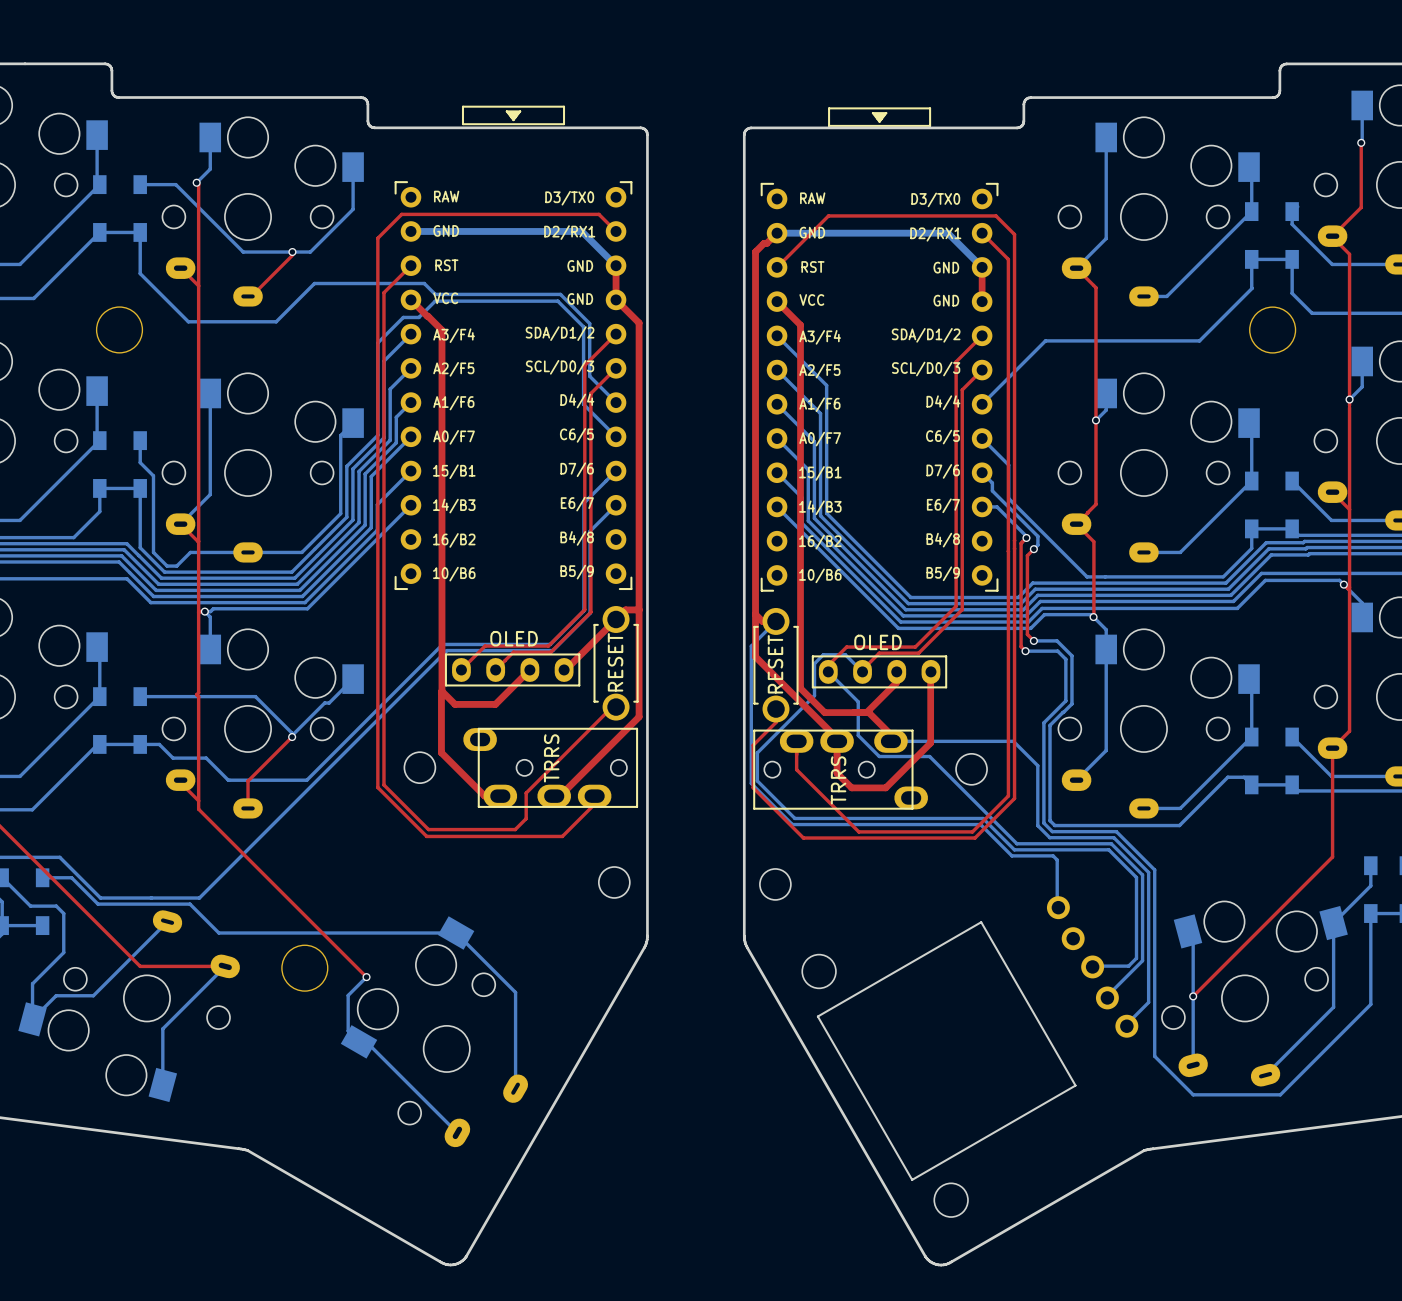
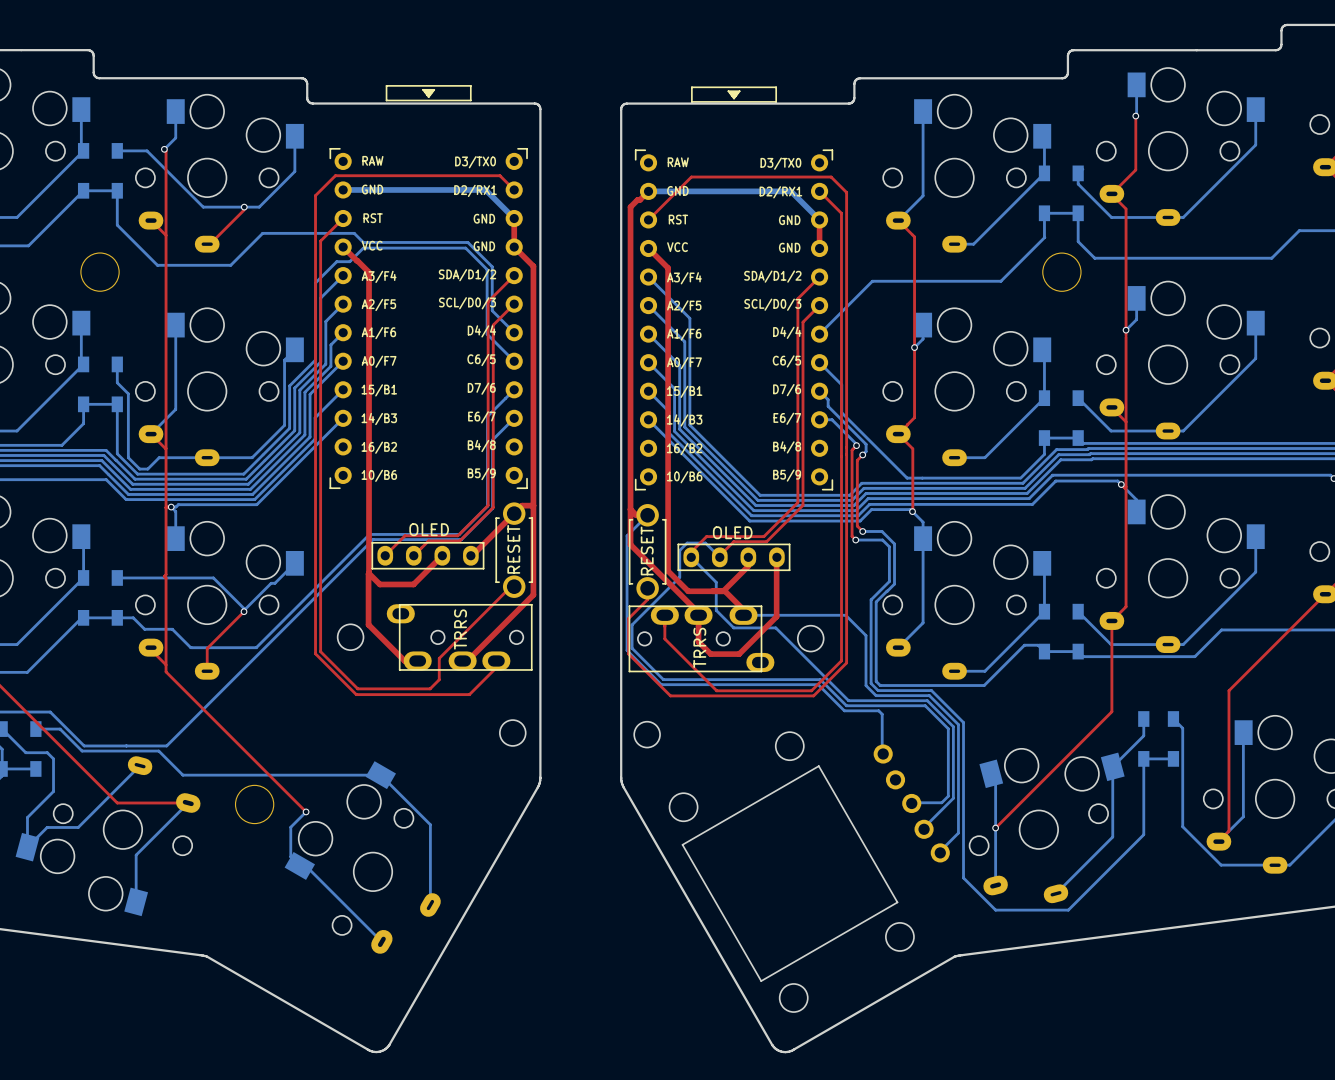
part footprint: [801, 896, 1139, 1218] -> [668, 731, 950, 1013]

